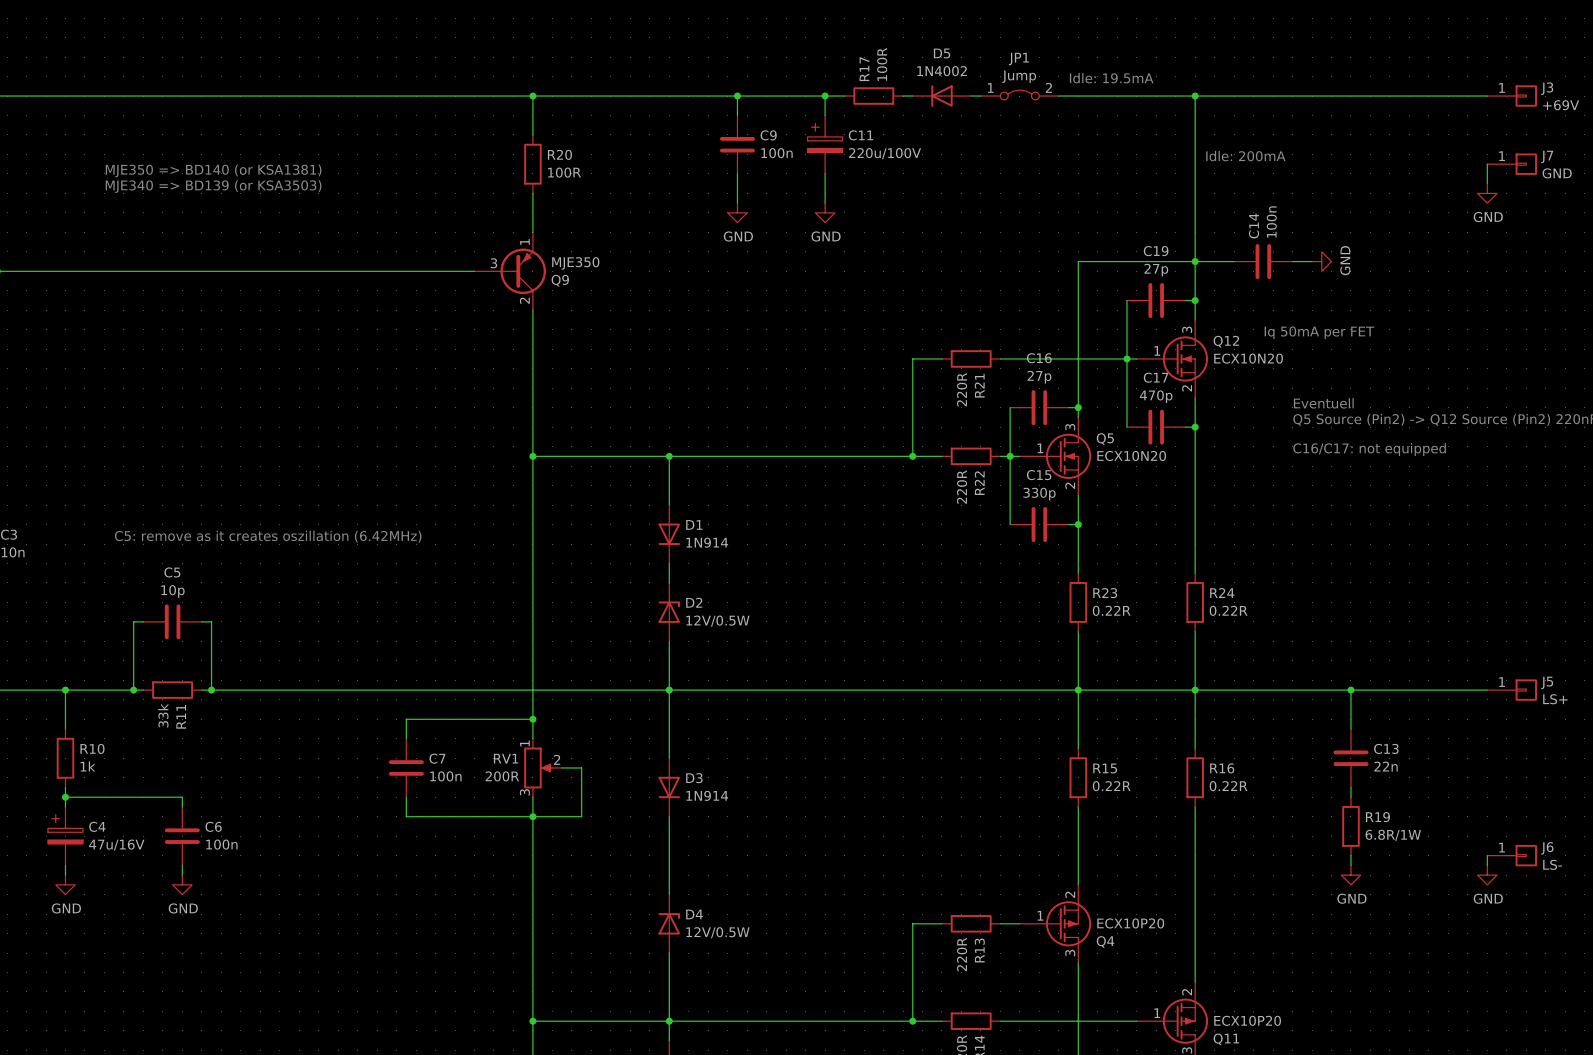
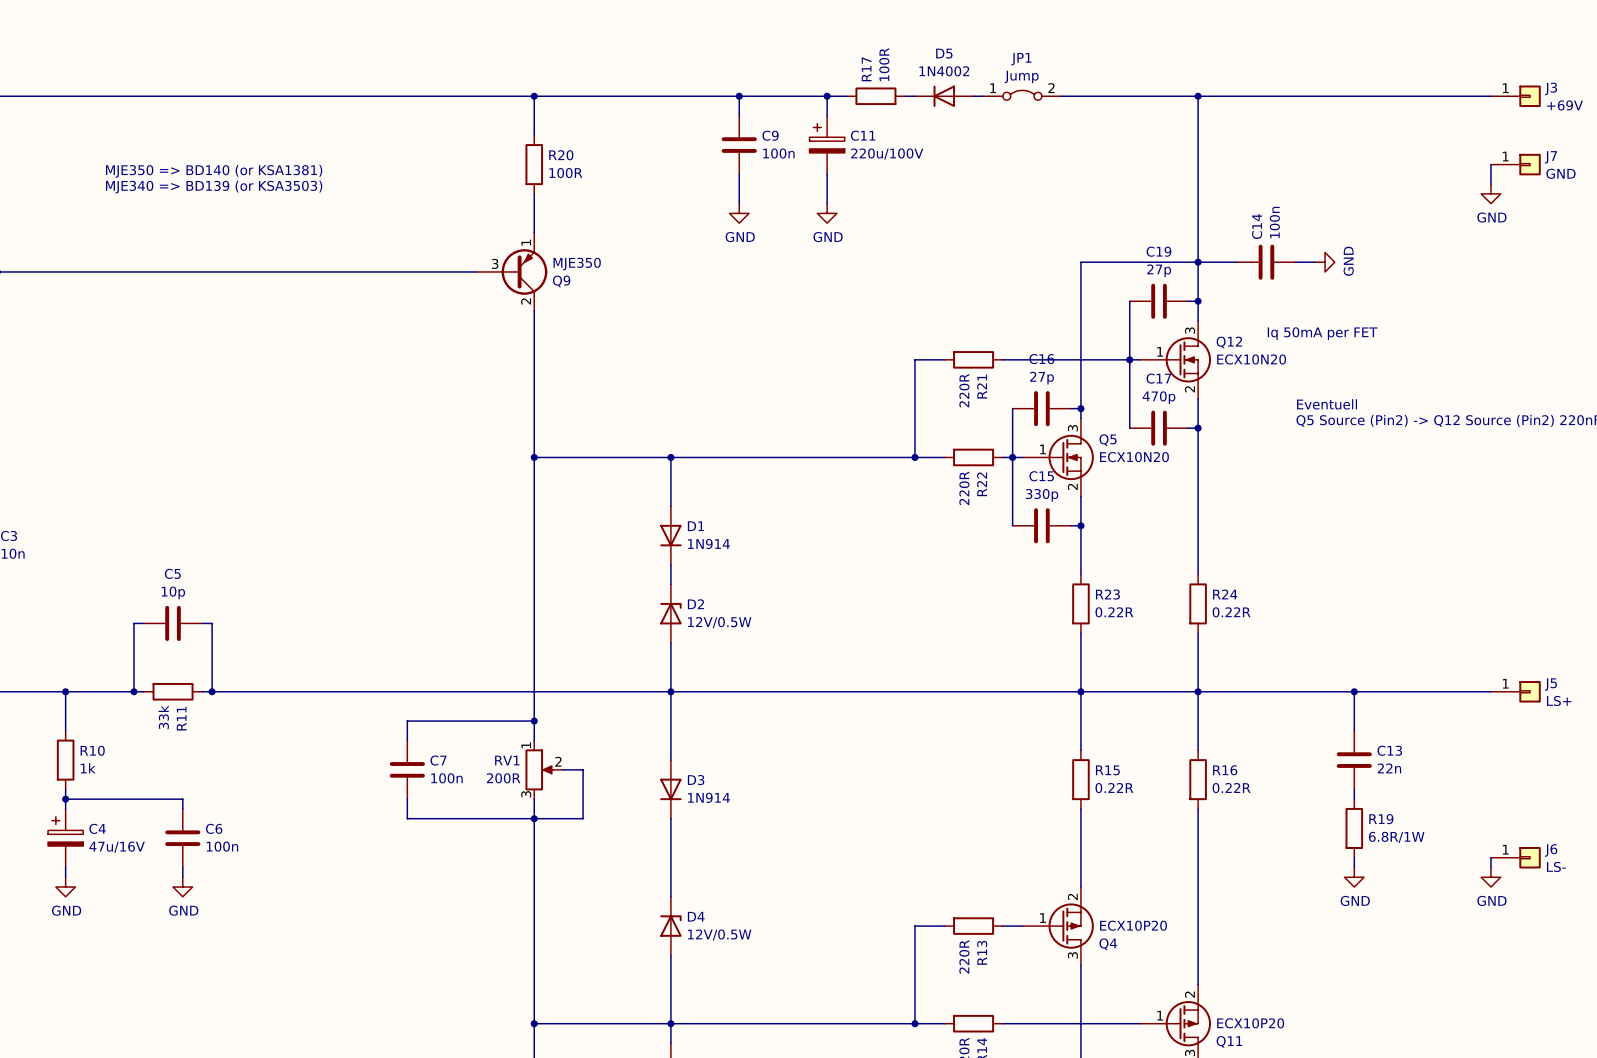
text: Idle: 19.5mA (1111, 78) -> none
text: Idle: 200mA (1245, 156) -> none
text: C16/C17: not equipped (1369, 449) -> none
text: C5: remove as it creates oszillation (6.42MHz) (268, 536) -> none

